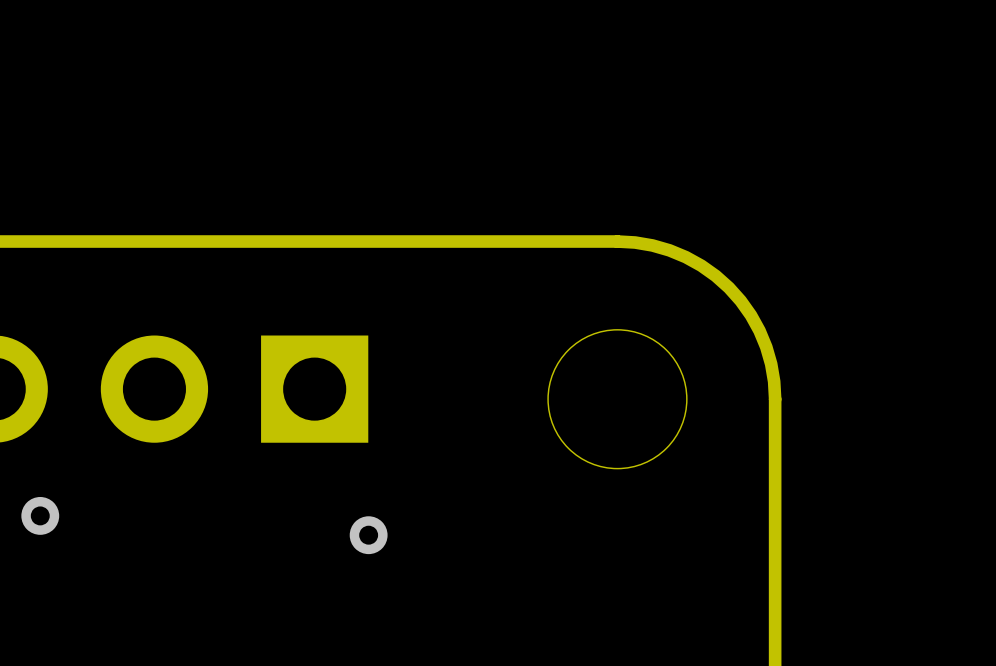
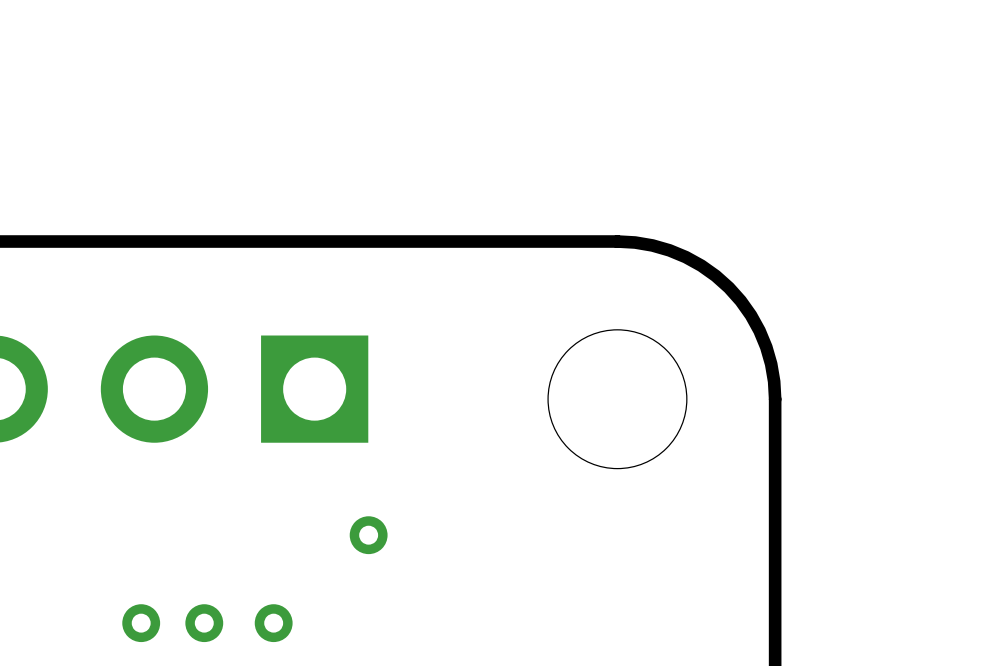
via: (40, 515) -> none
via: none -> (141, 623)
via: none -> (204, 623)
via: none -> (273, 623)

